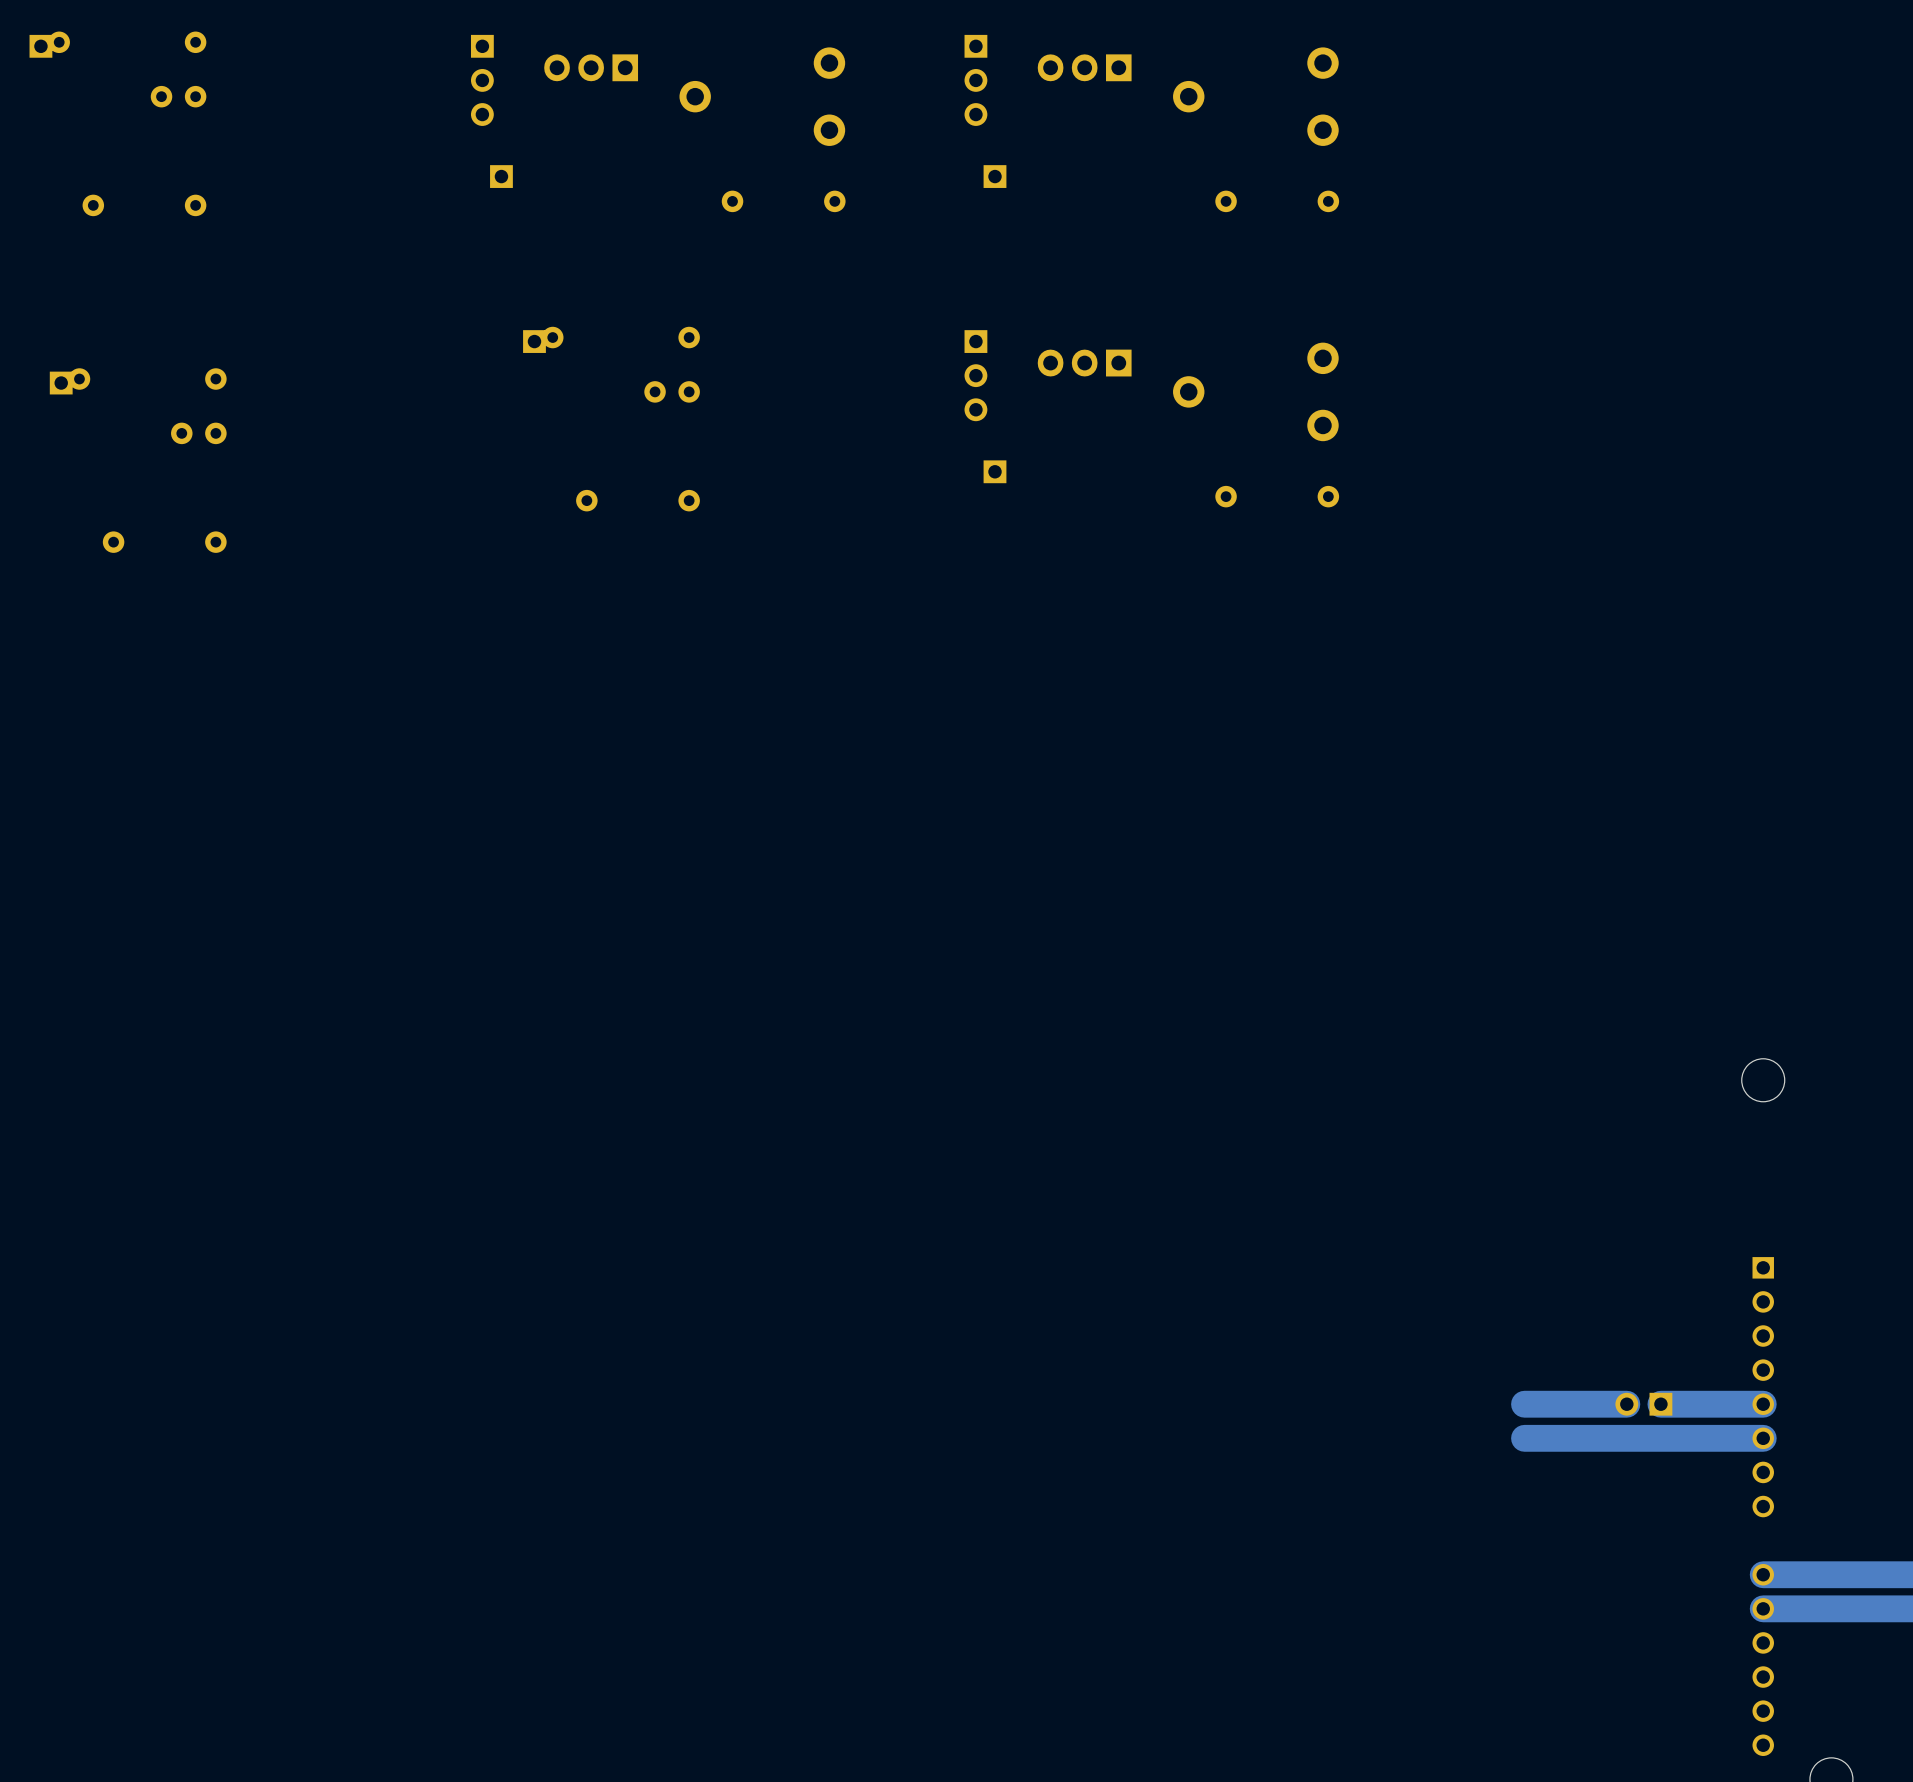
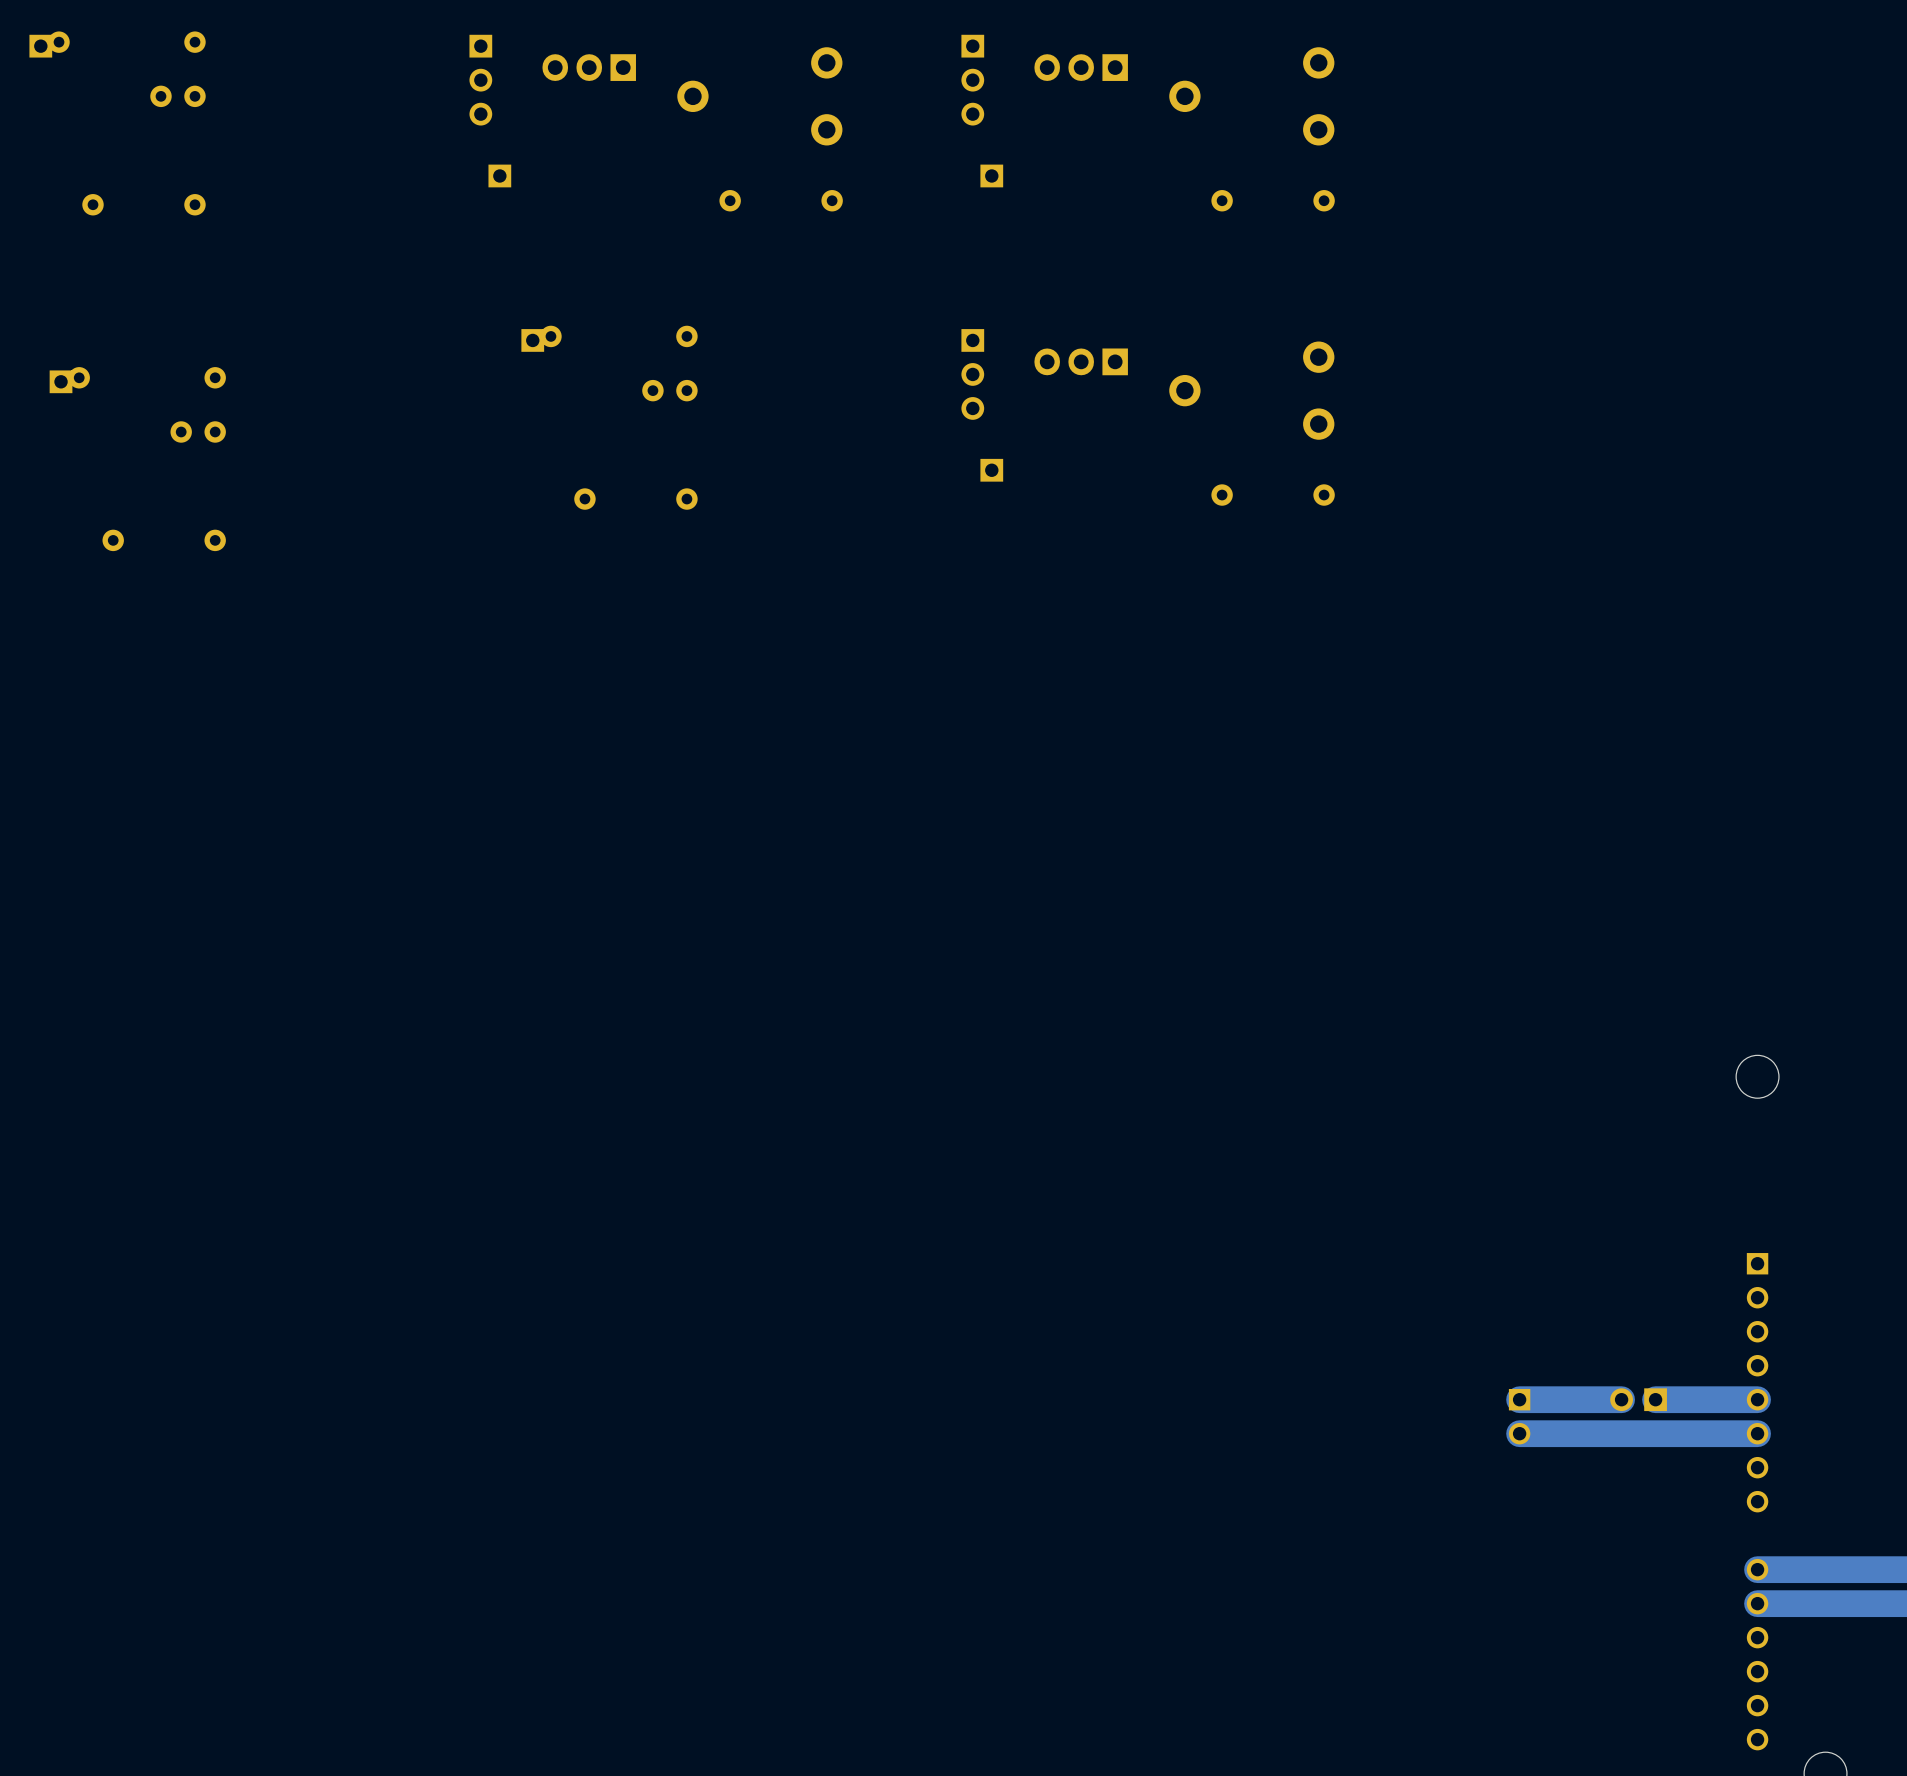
part: none -> (1519, 1416)

